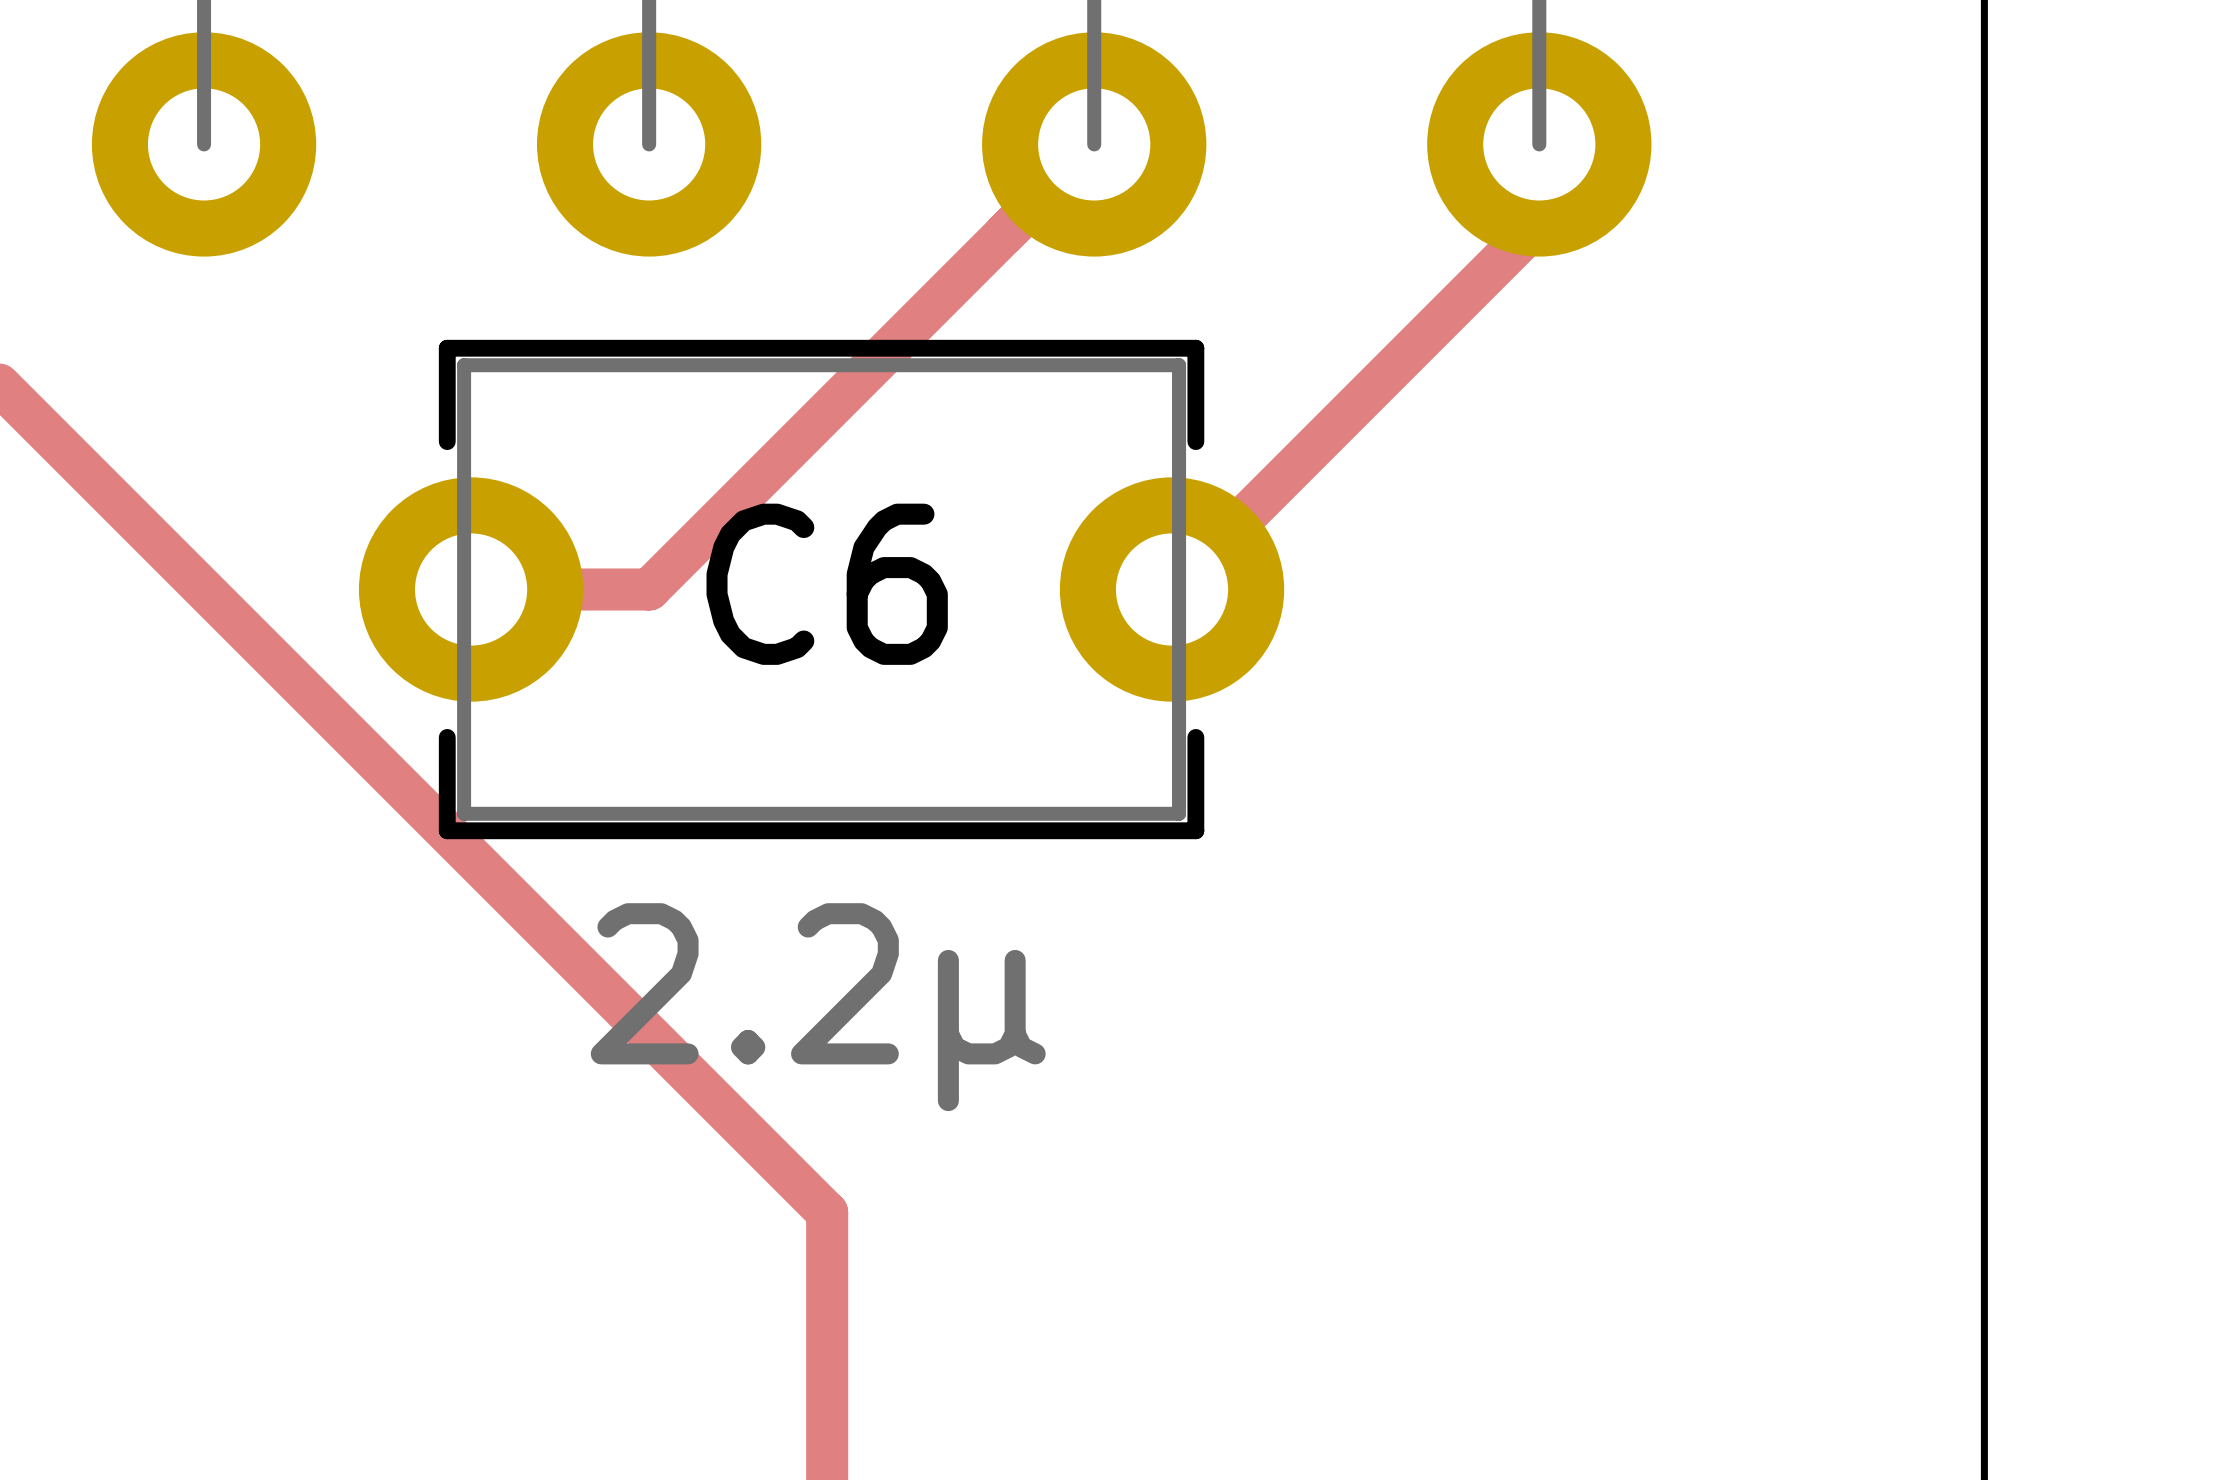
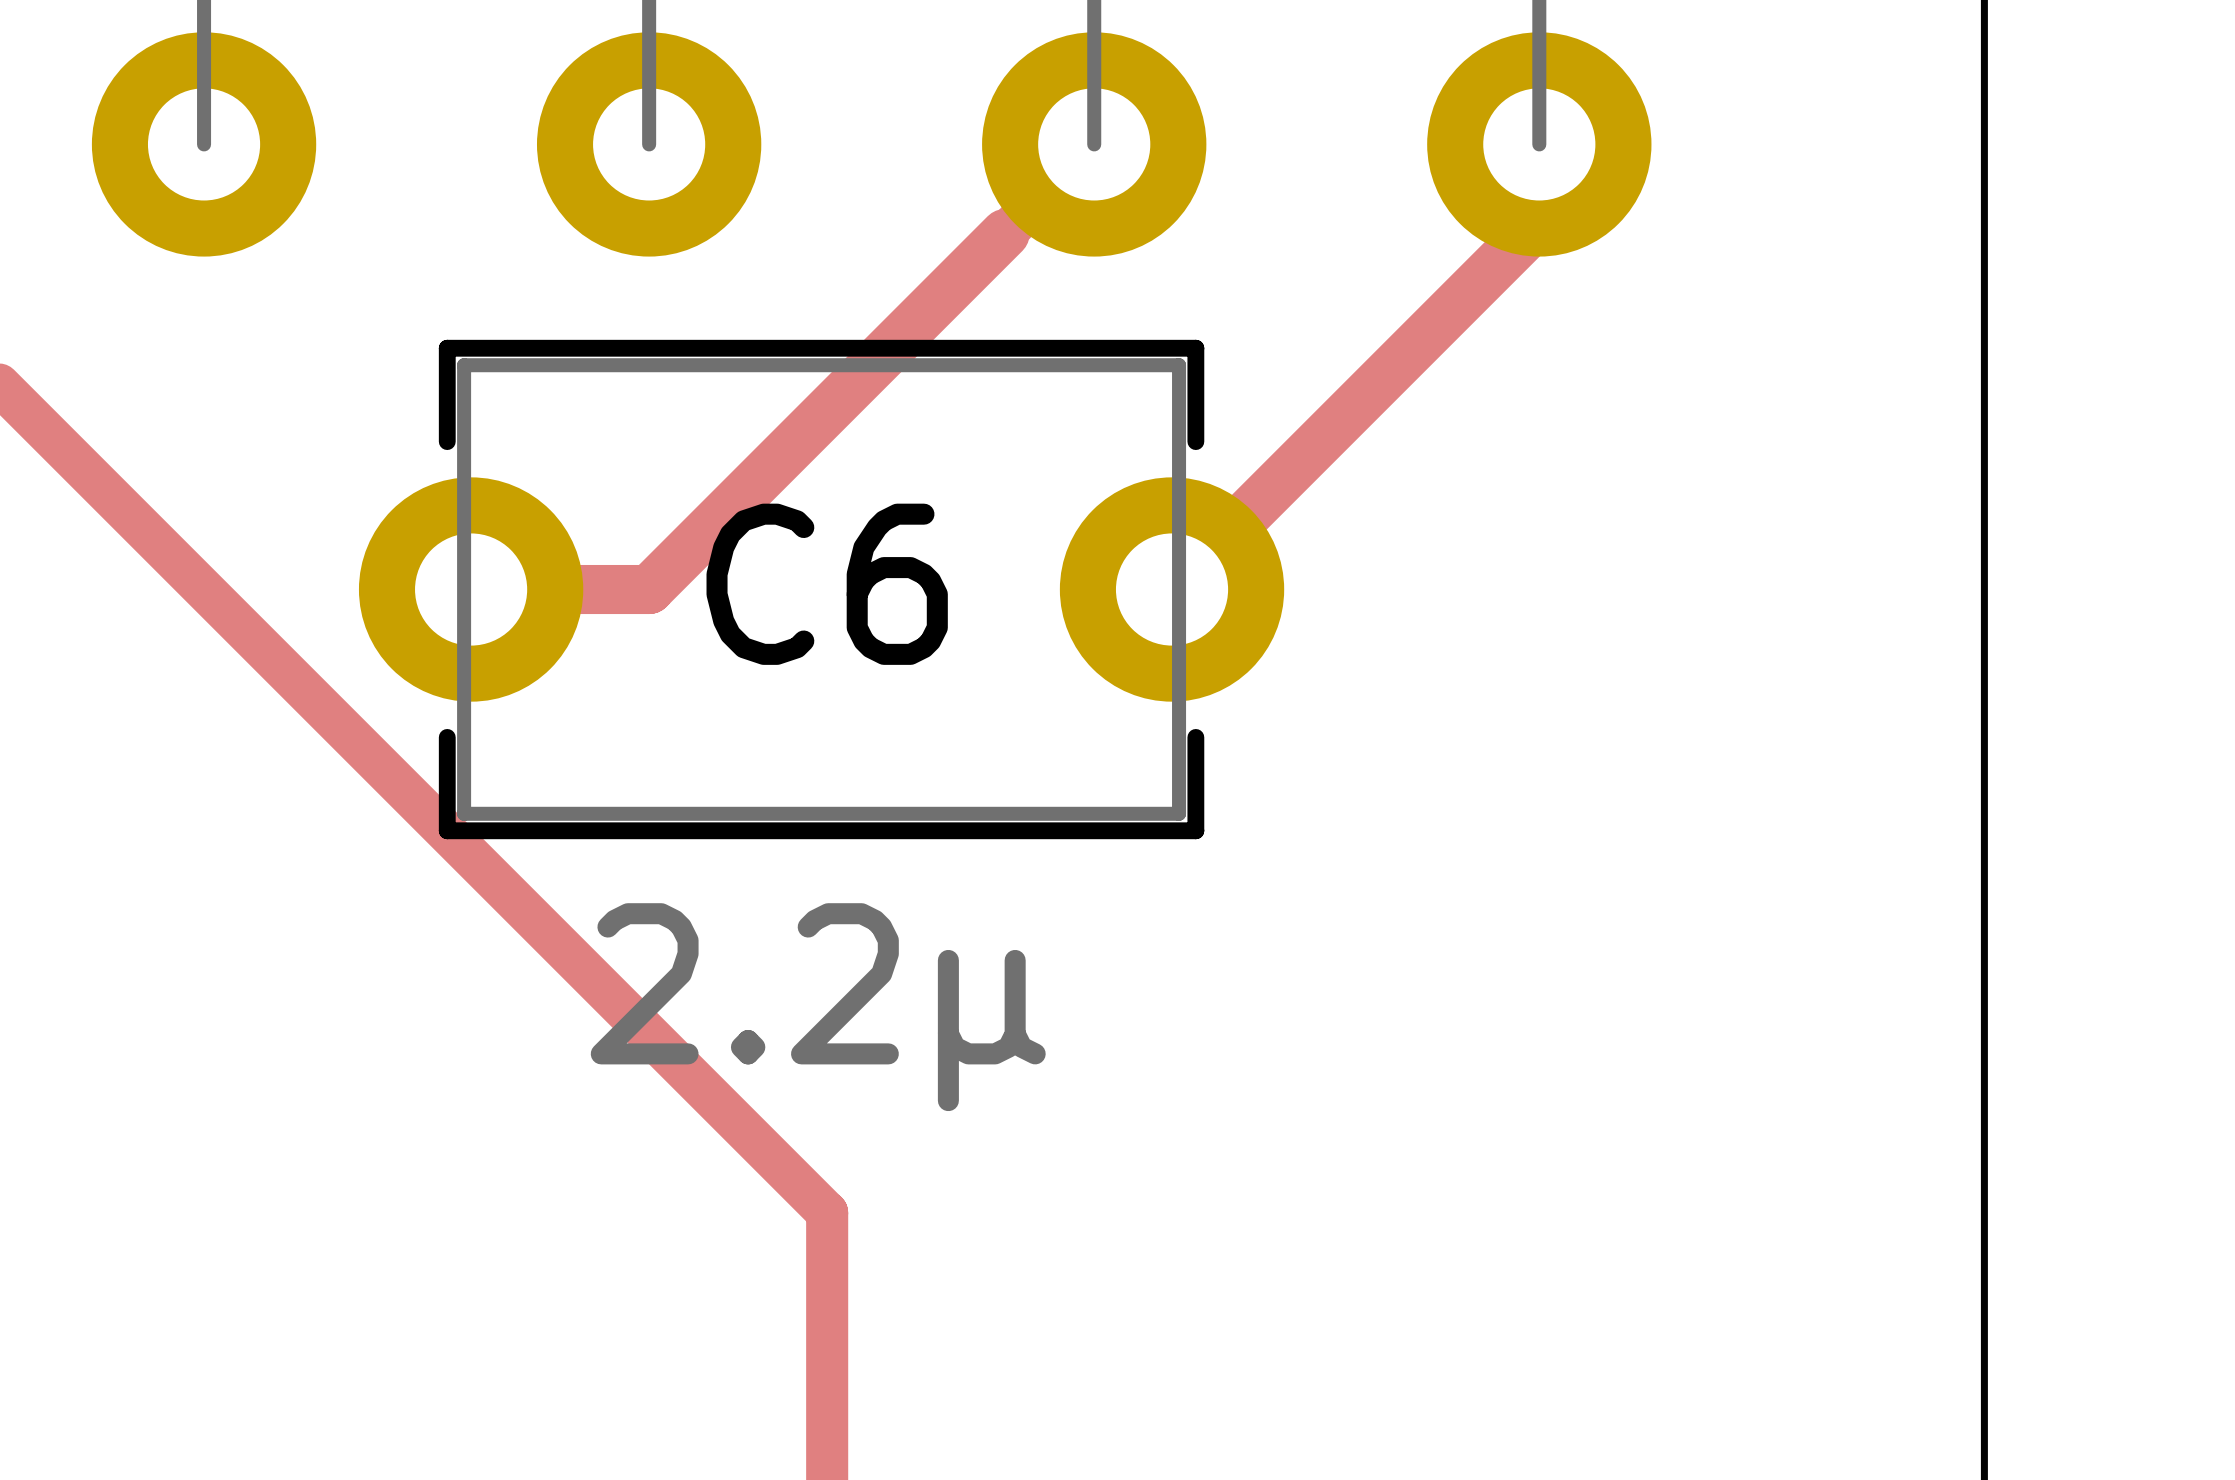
track width: thin (1539, 144) (1539, 222) (1172, 589) -> thick (1539, 144) (1539, 222) (1172, 589)
track width: thin (1005, 233) (649, 589) (471, 589) -> thick (1005, 233) (649, 589) (471, 589)

